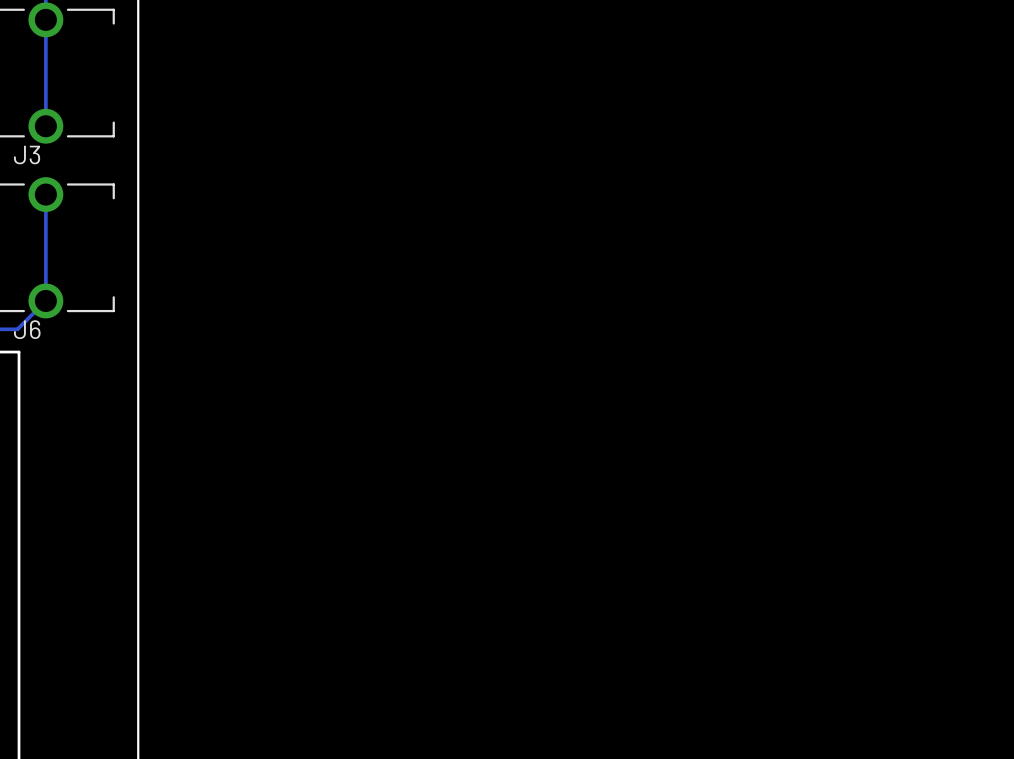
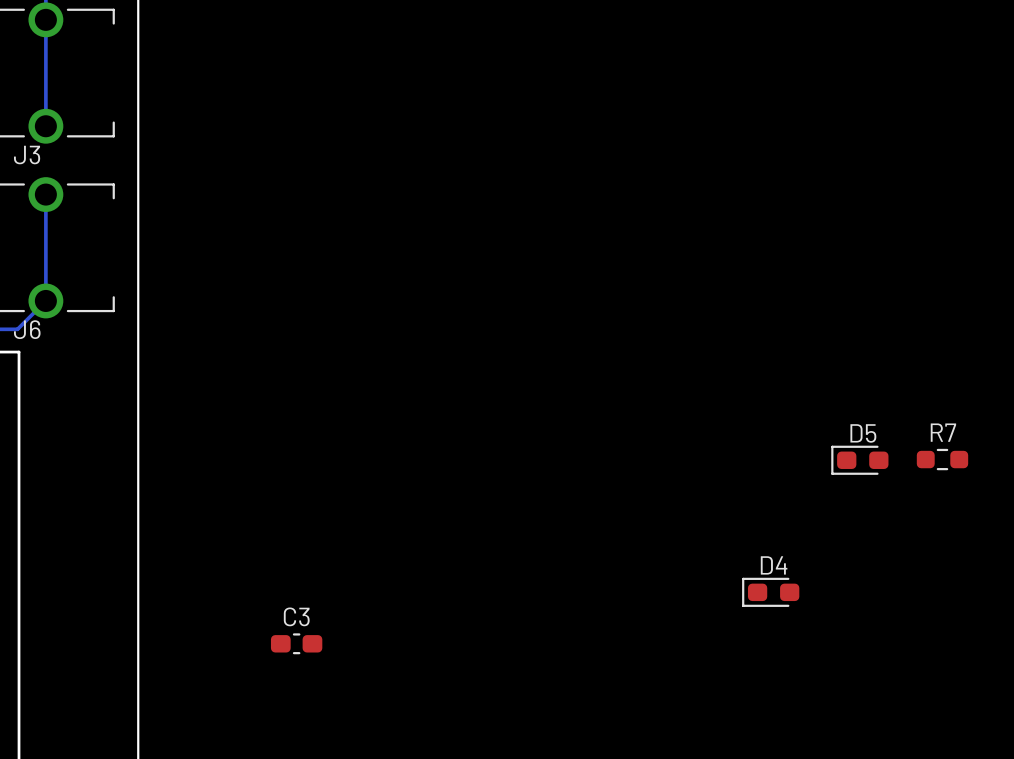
R7: none -> (942, 459)
D5: none -> (859, 460)
D4: none -> (770, 592)
C3: none -> (296, 643)

